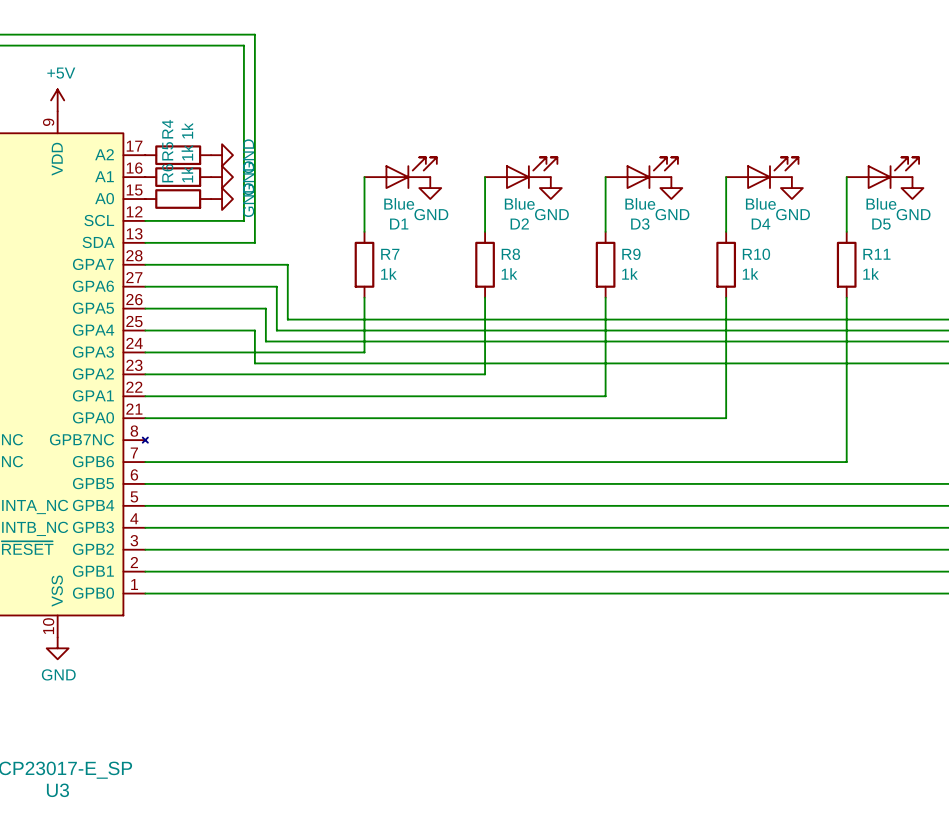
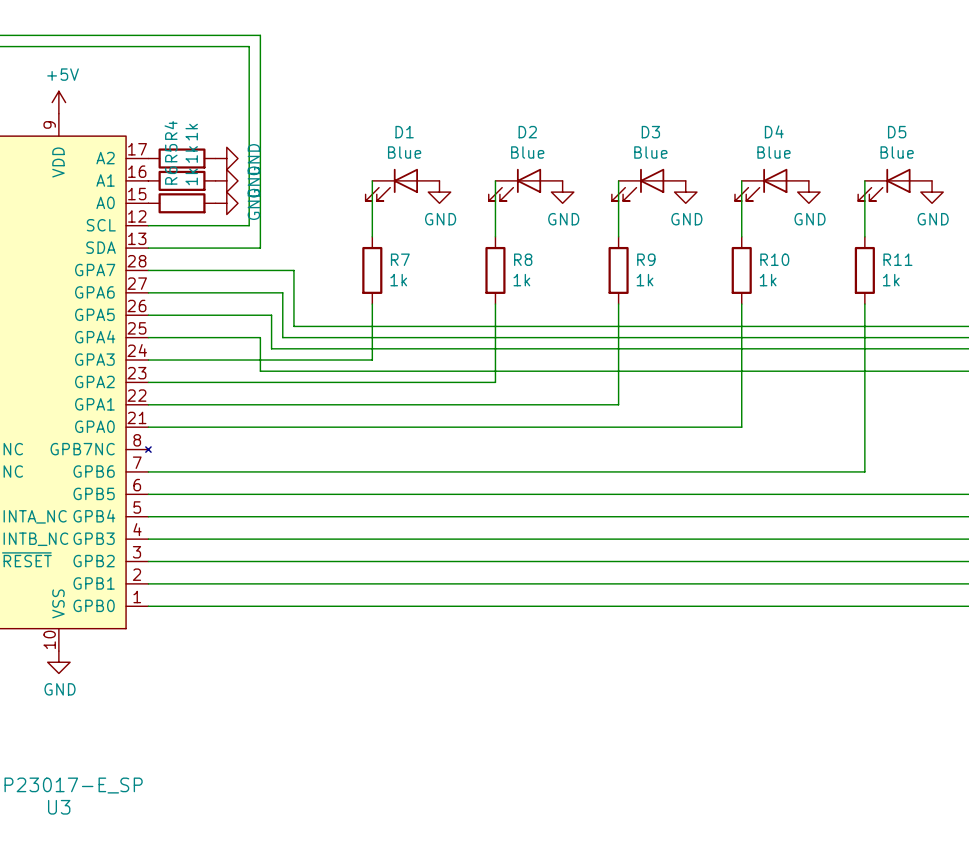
D1 rotation: 0° (411, 173) -> 180° (391, 184)
D2 rotation: 0° (531, 173) -> 180° (514, 184)
D3 rotation: 0° (652, 173) -> 180° (638, 184)
D4 rotation: 0° (772, 173) -> 180° (761, 184)
D5 rotation: 0° (893, 173) -> 180° (884, 184)

